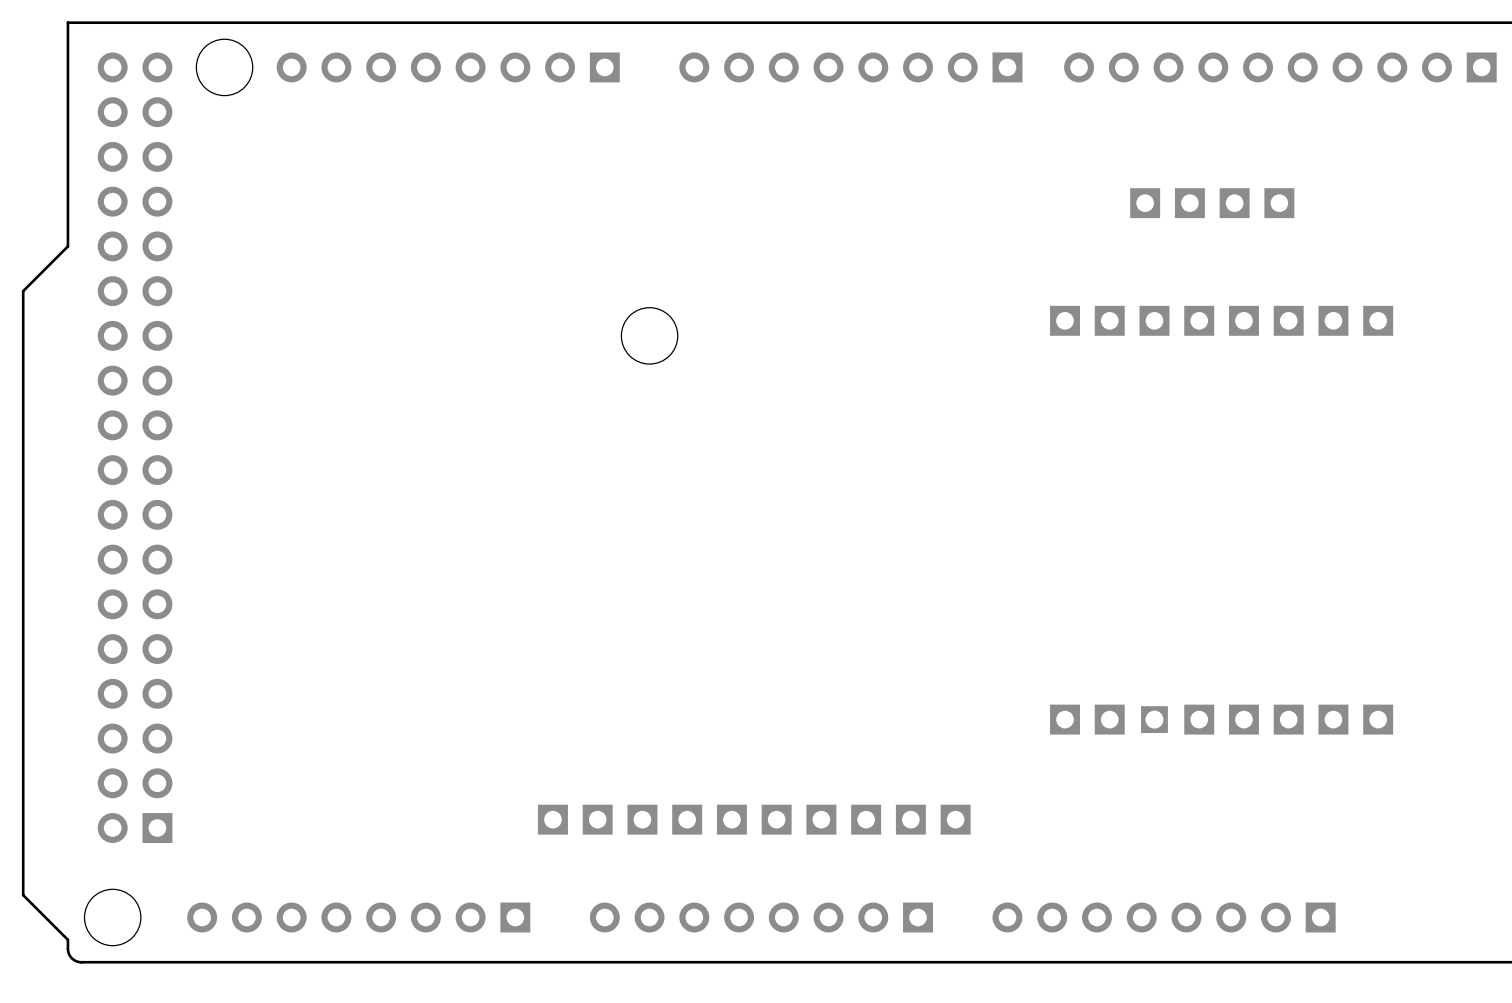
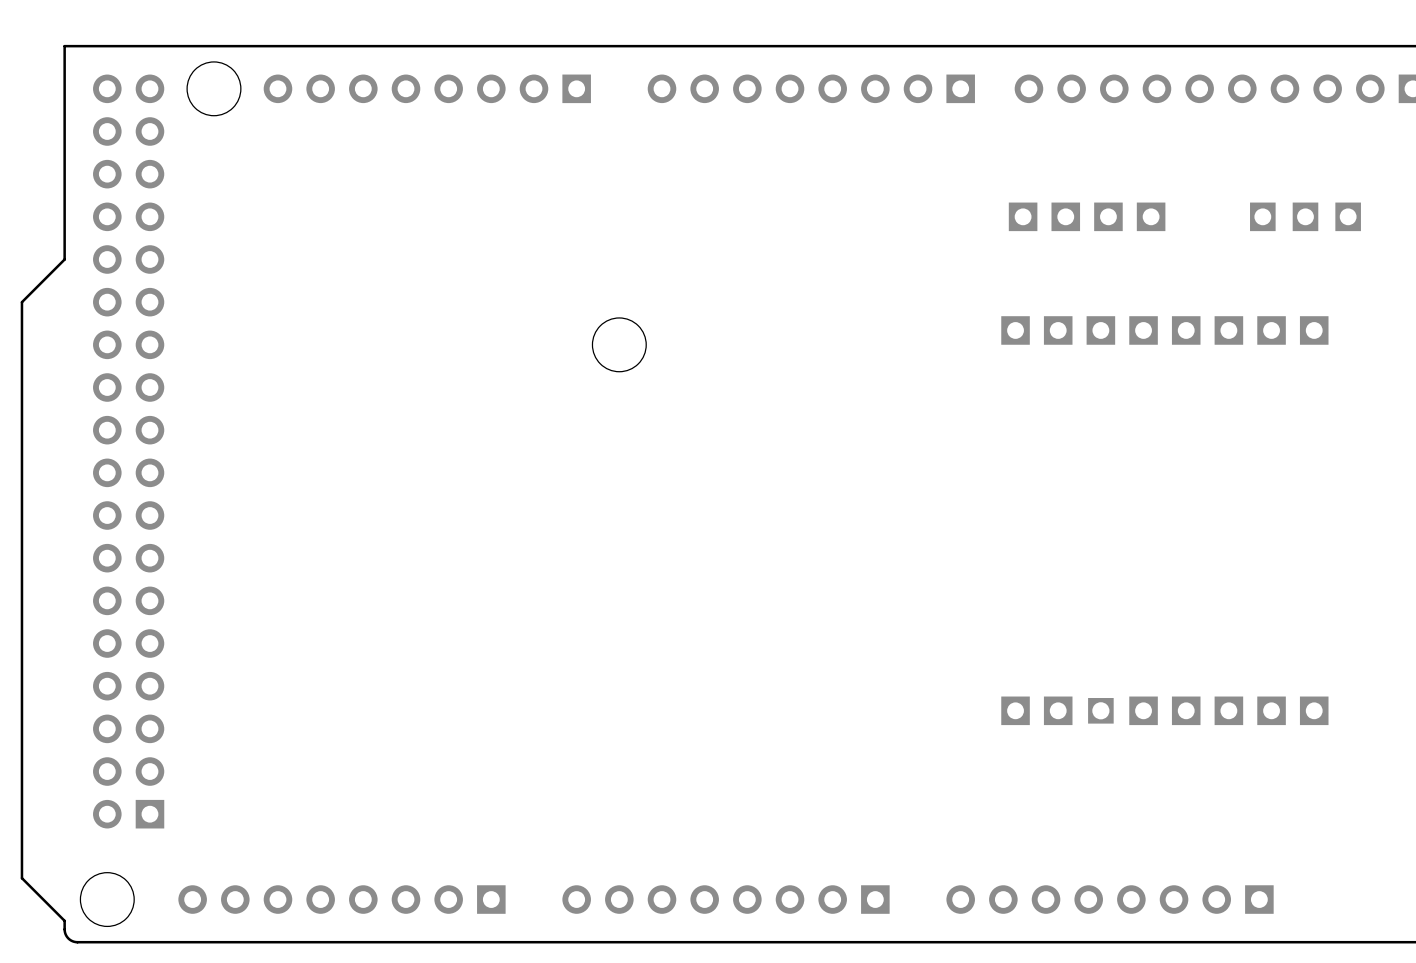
part: none -> (1305, 216)
part position: (1212, 203) -> (1087, 216)
part: (754, 819) -> none

